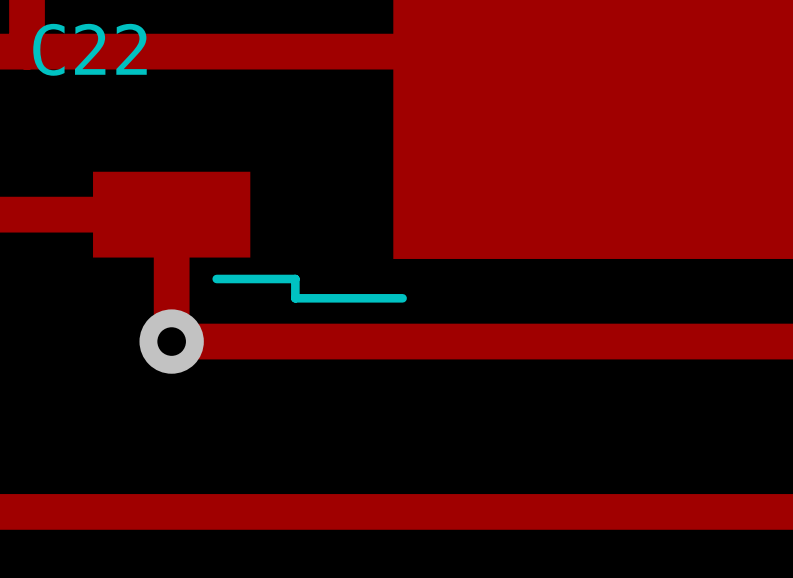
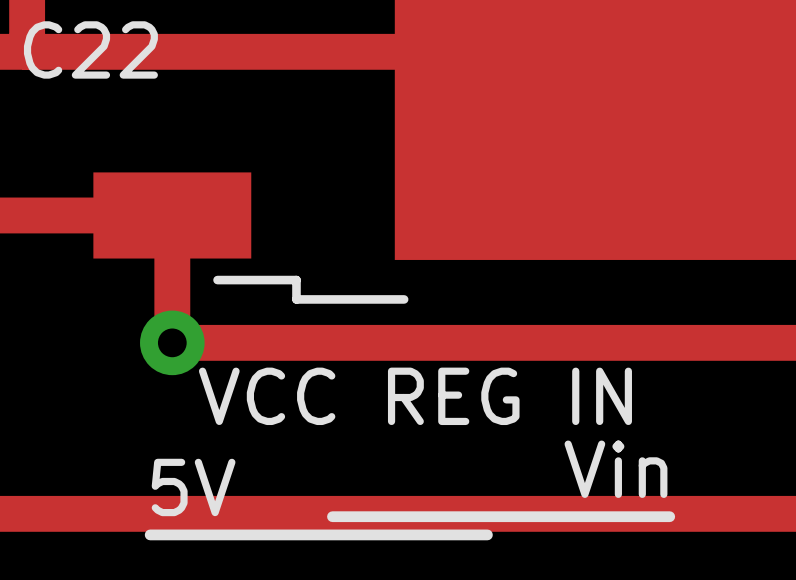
text: none -> VCC REG IN (415, 396)
text: none -> Vin (616, 469)
text: none -> 5V (193, 487)
line: none -> (332, 516) (669, 516)
line: none -> (150, 534) (487, 534)

